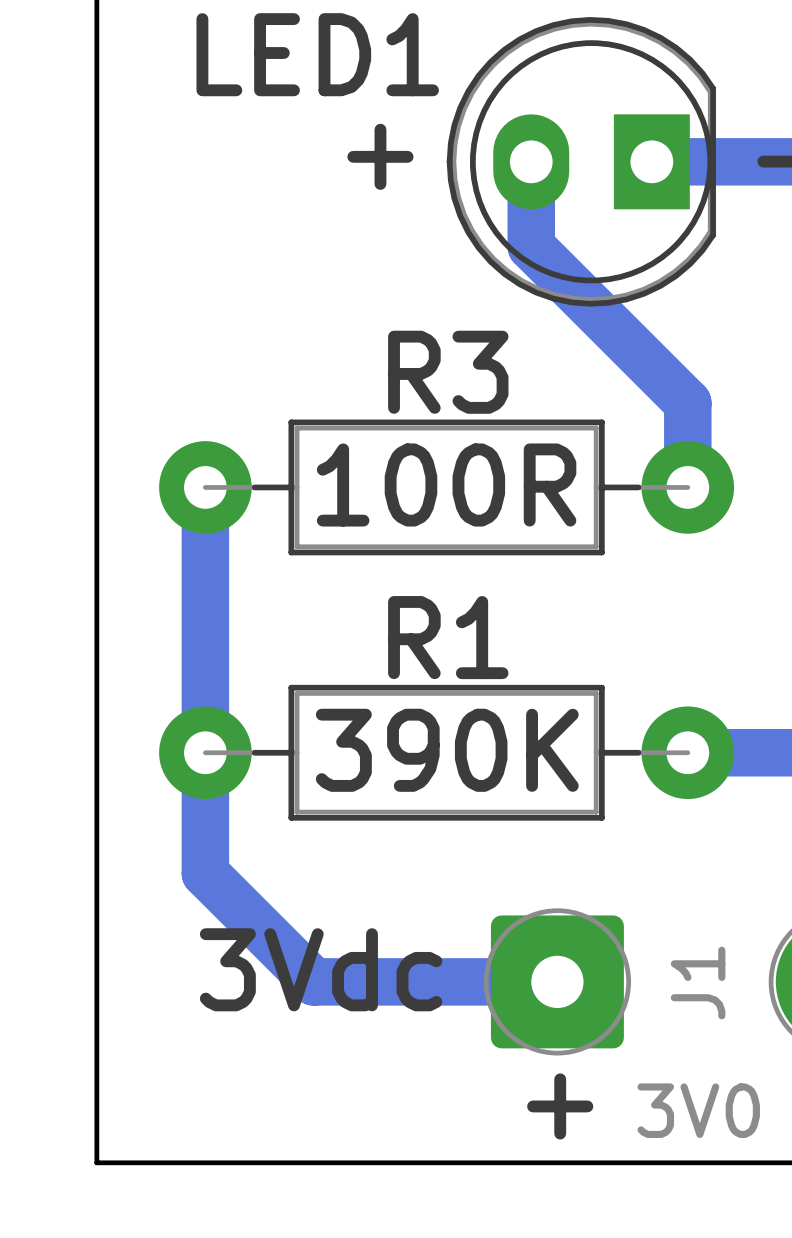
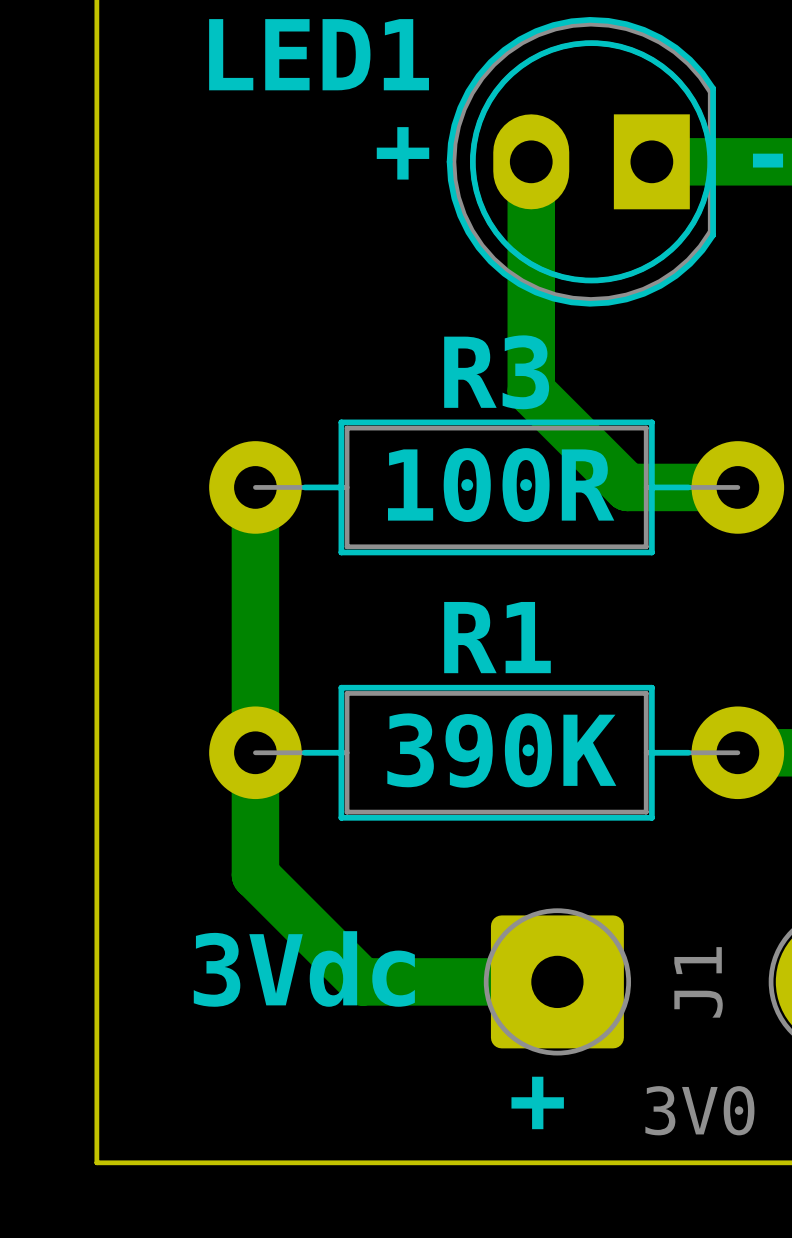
bottom track: (531, 246) (687, 403) (687, 487) -> (531, 246) (531, 391) (627, 487) (737, 487)
bottom track: (205, 487) (205, 873) (313, 981) (362, 981) -> (255, 487) (255, 875) (362, 981)
R3 position: (446, 487) -> (496, 487)
R1 position: (446, 752) -> (496, 752)

